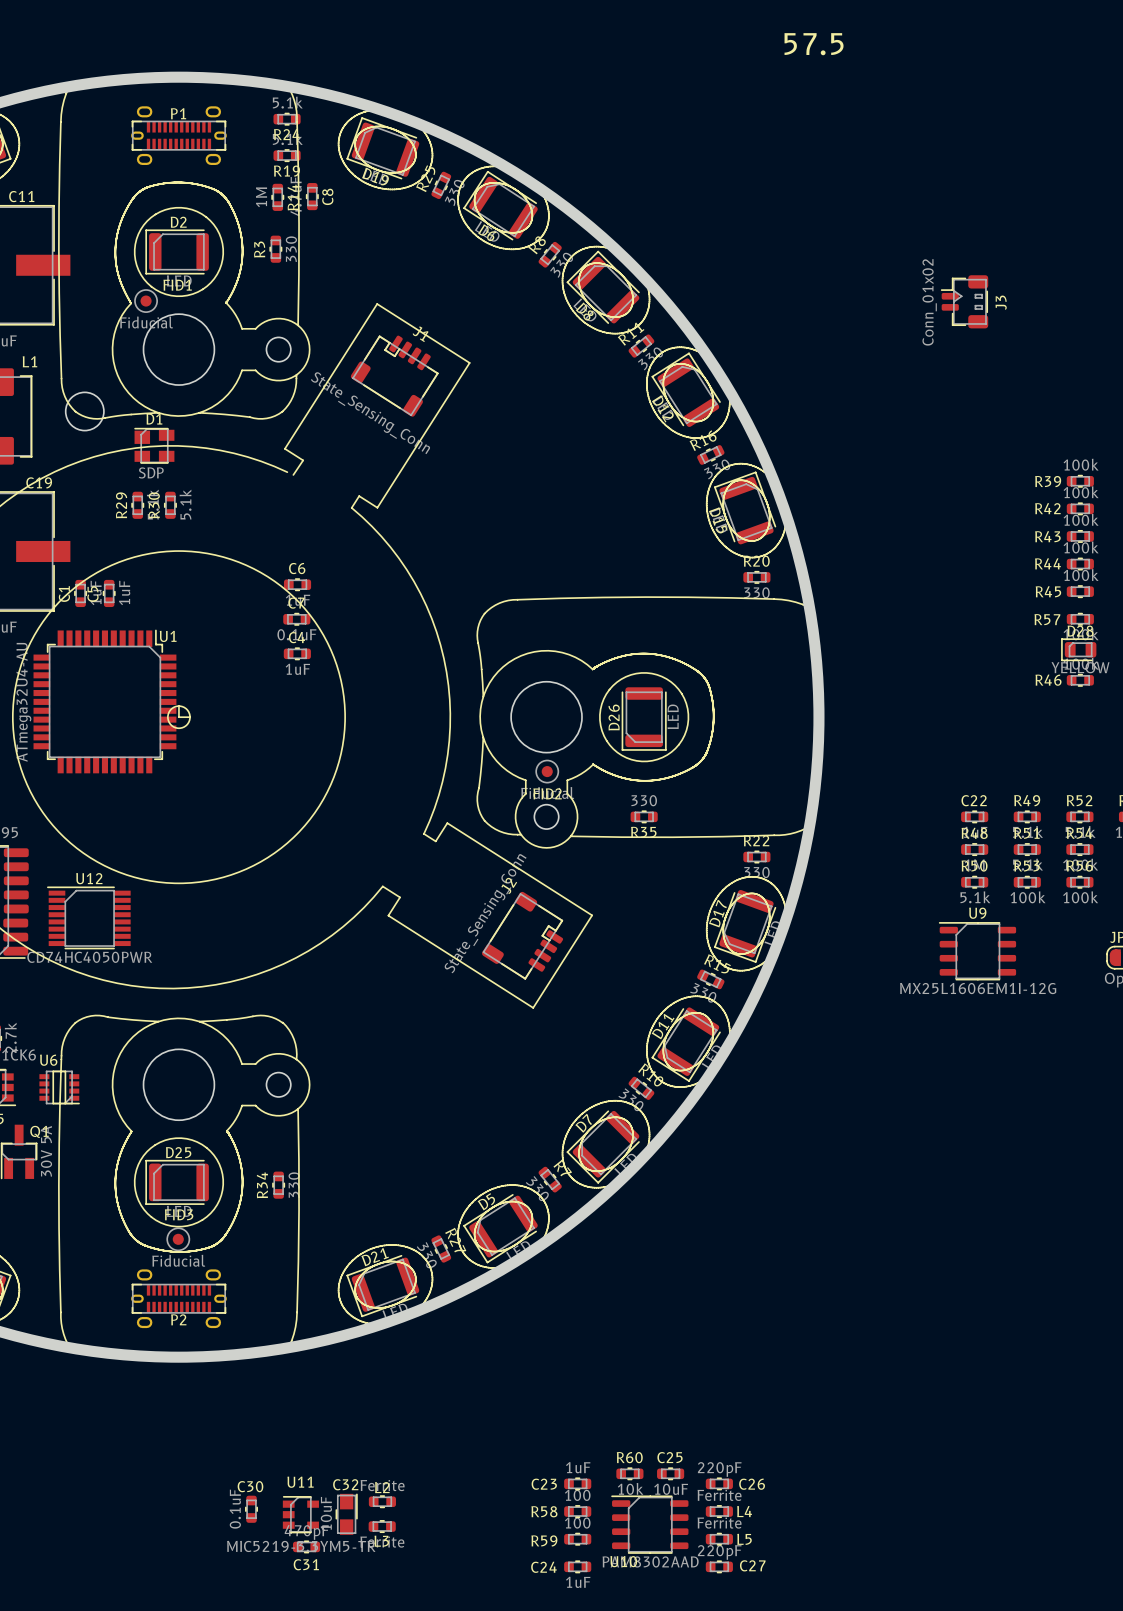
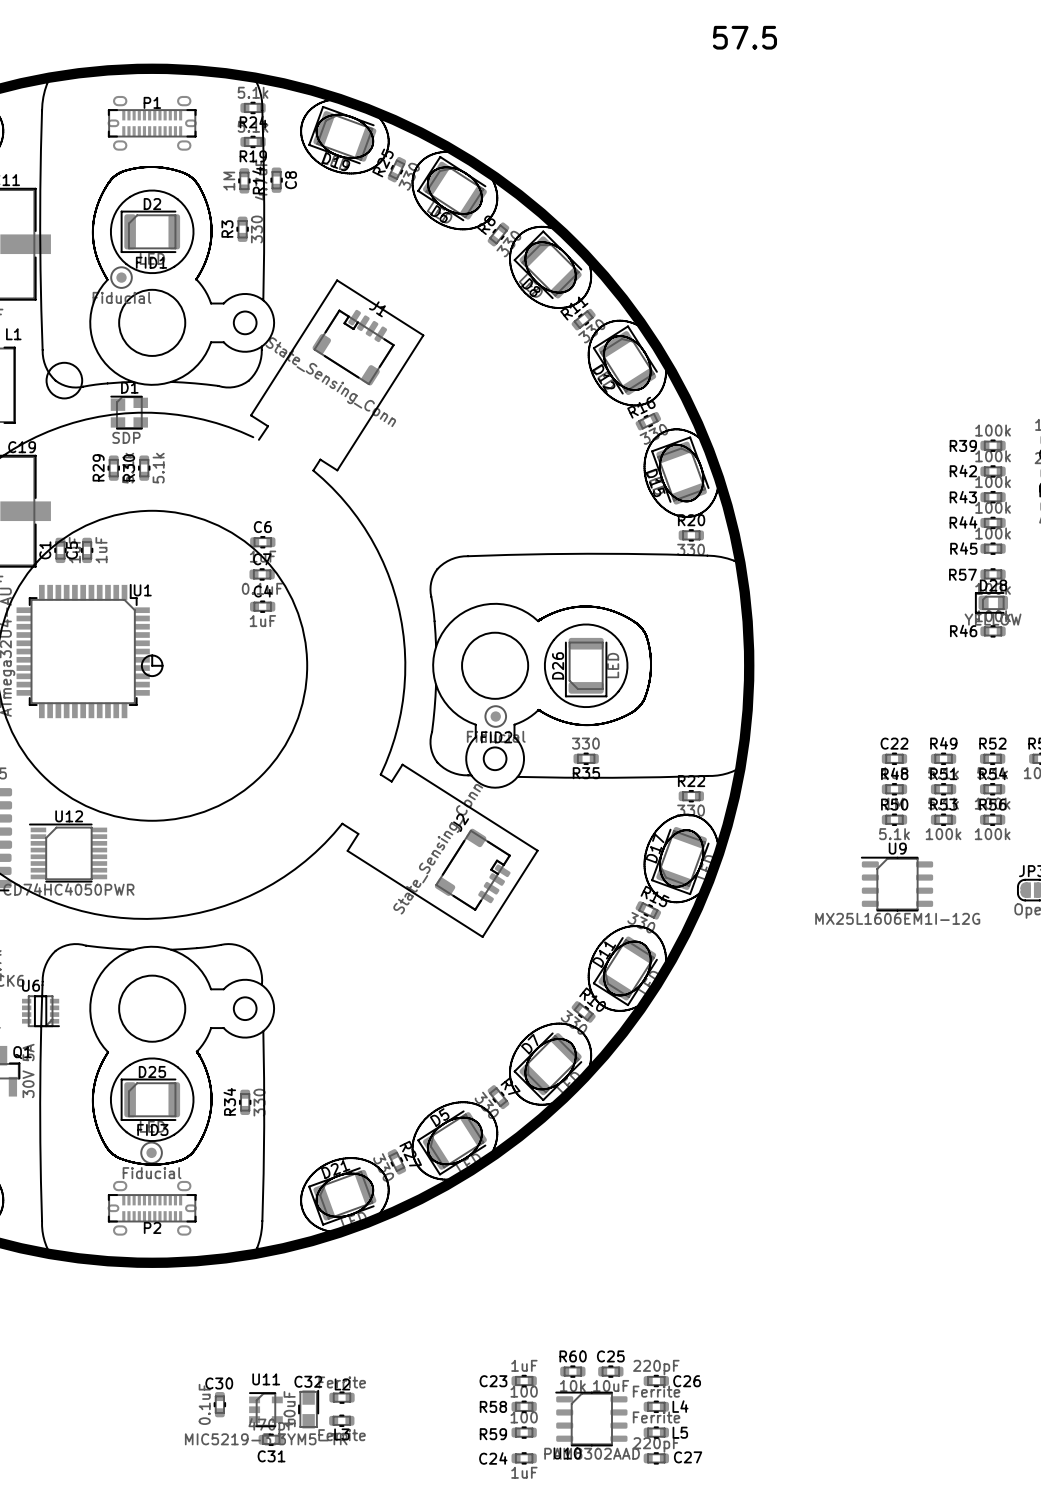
J3: Conn_01x02 (964, 301) -> none

